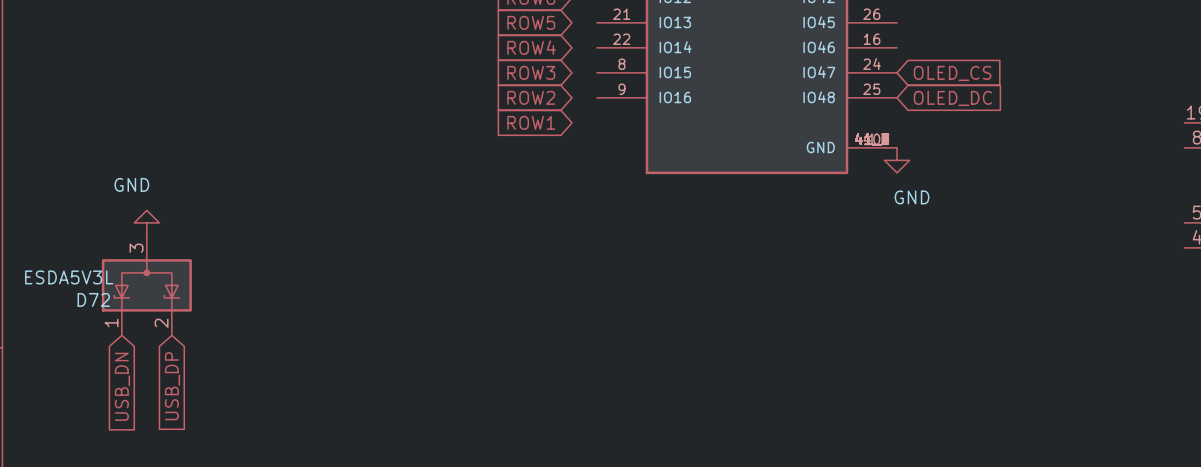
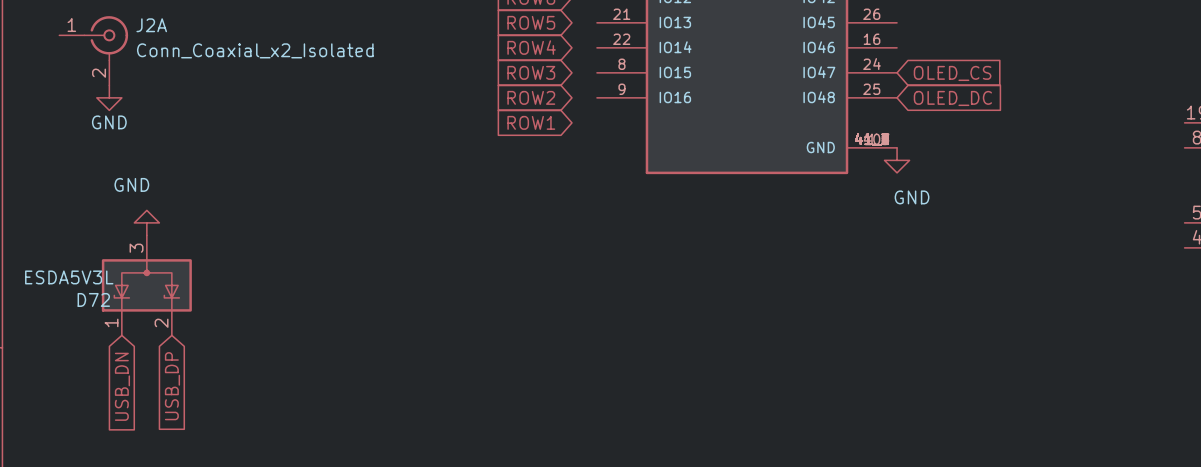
J2A: none -> Conn_Coaxial_x2_Isolated (93, 50)
power symbol: none -> GND (109, 97)

